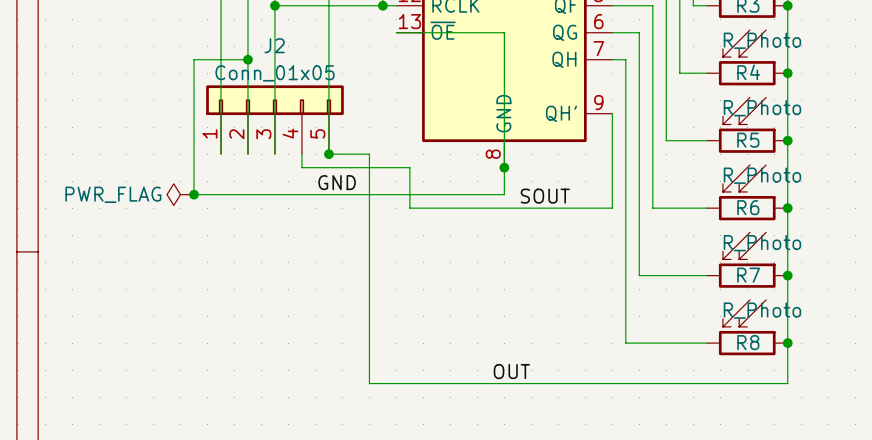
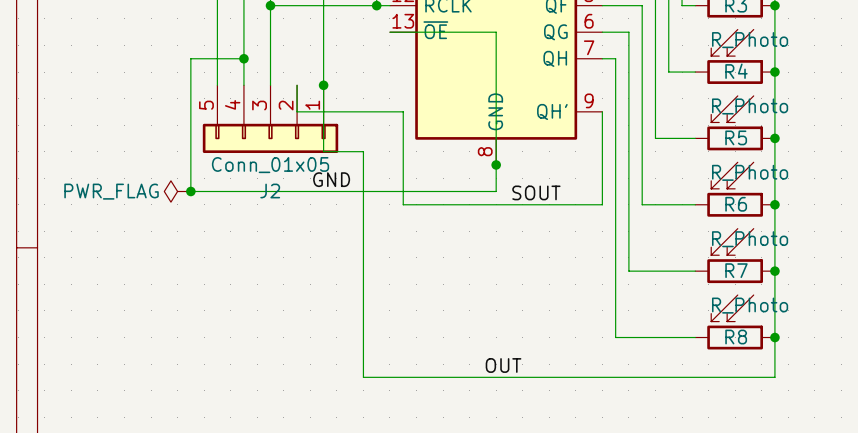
junction: none -> (323, 85)
J2 rotation: 0° (274, 100) -> 180° (270, 138)
wire: (301, 154) (301, 167) (409, 167) -> (297, 85) (297, 111) (403, 111) (403, 164)
junction: (328, 154) -> none

